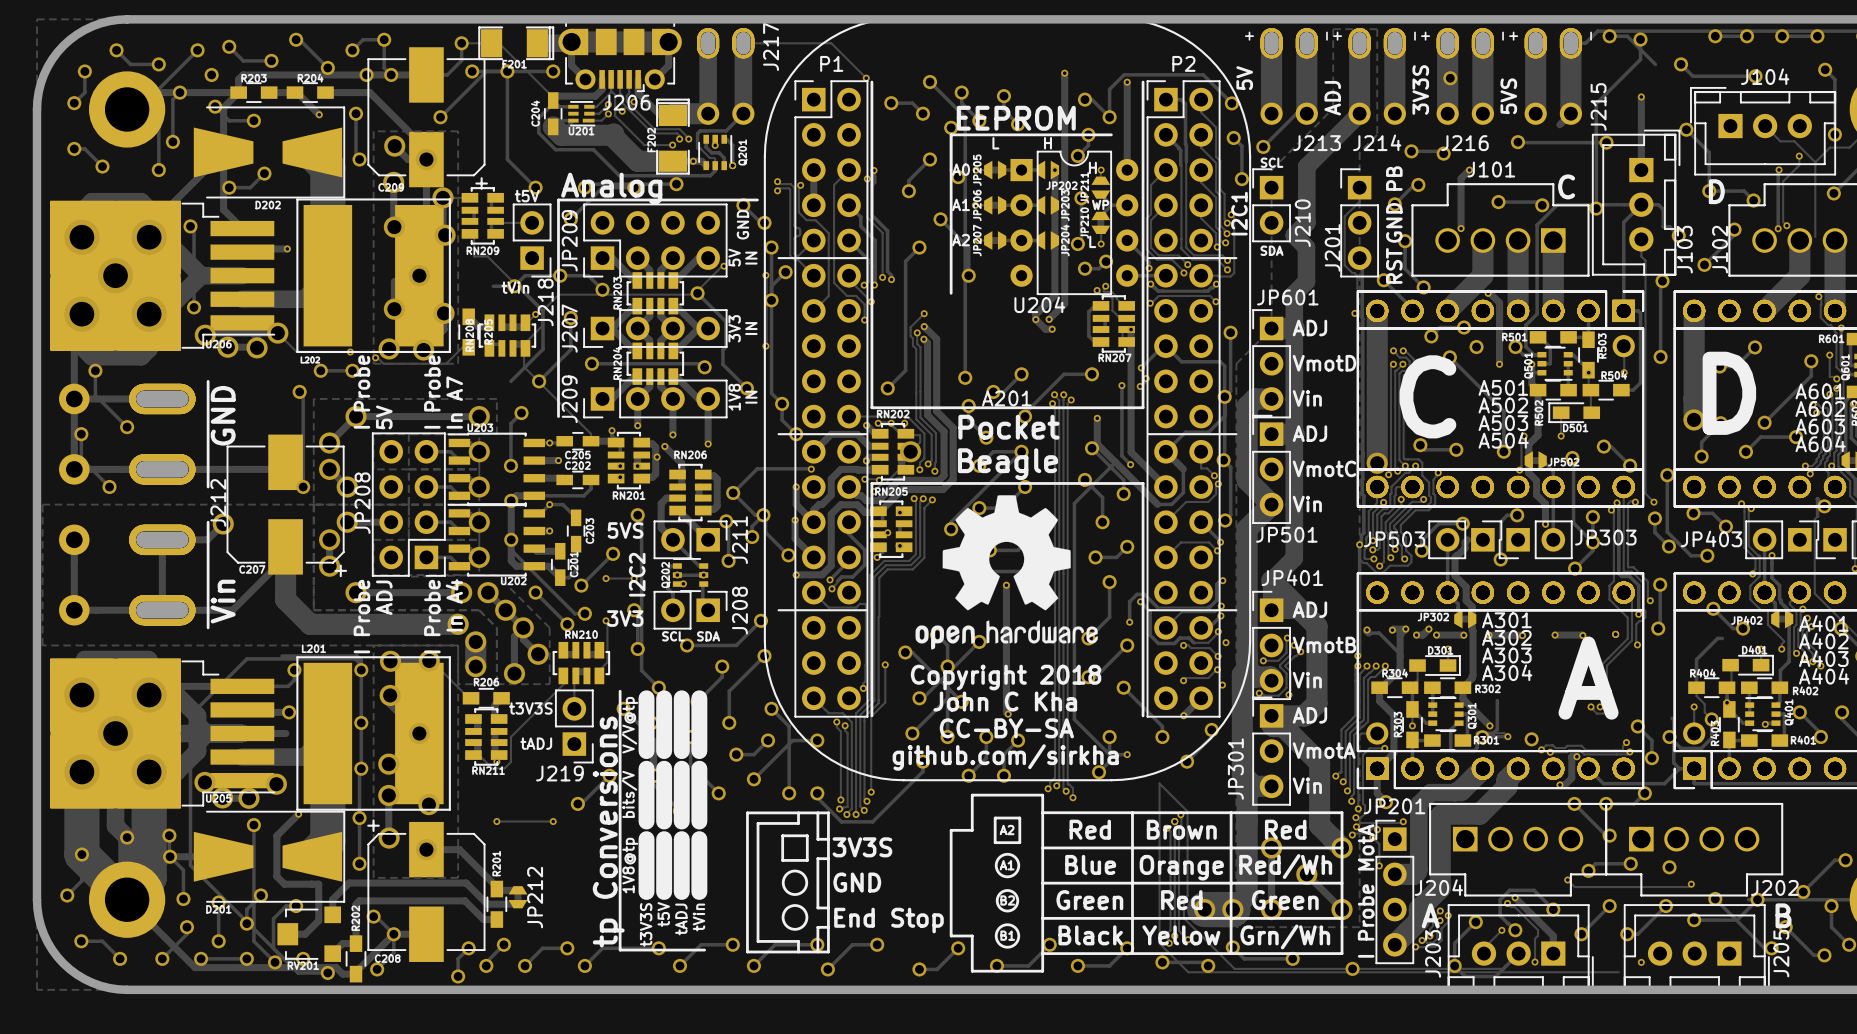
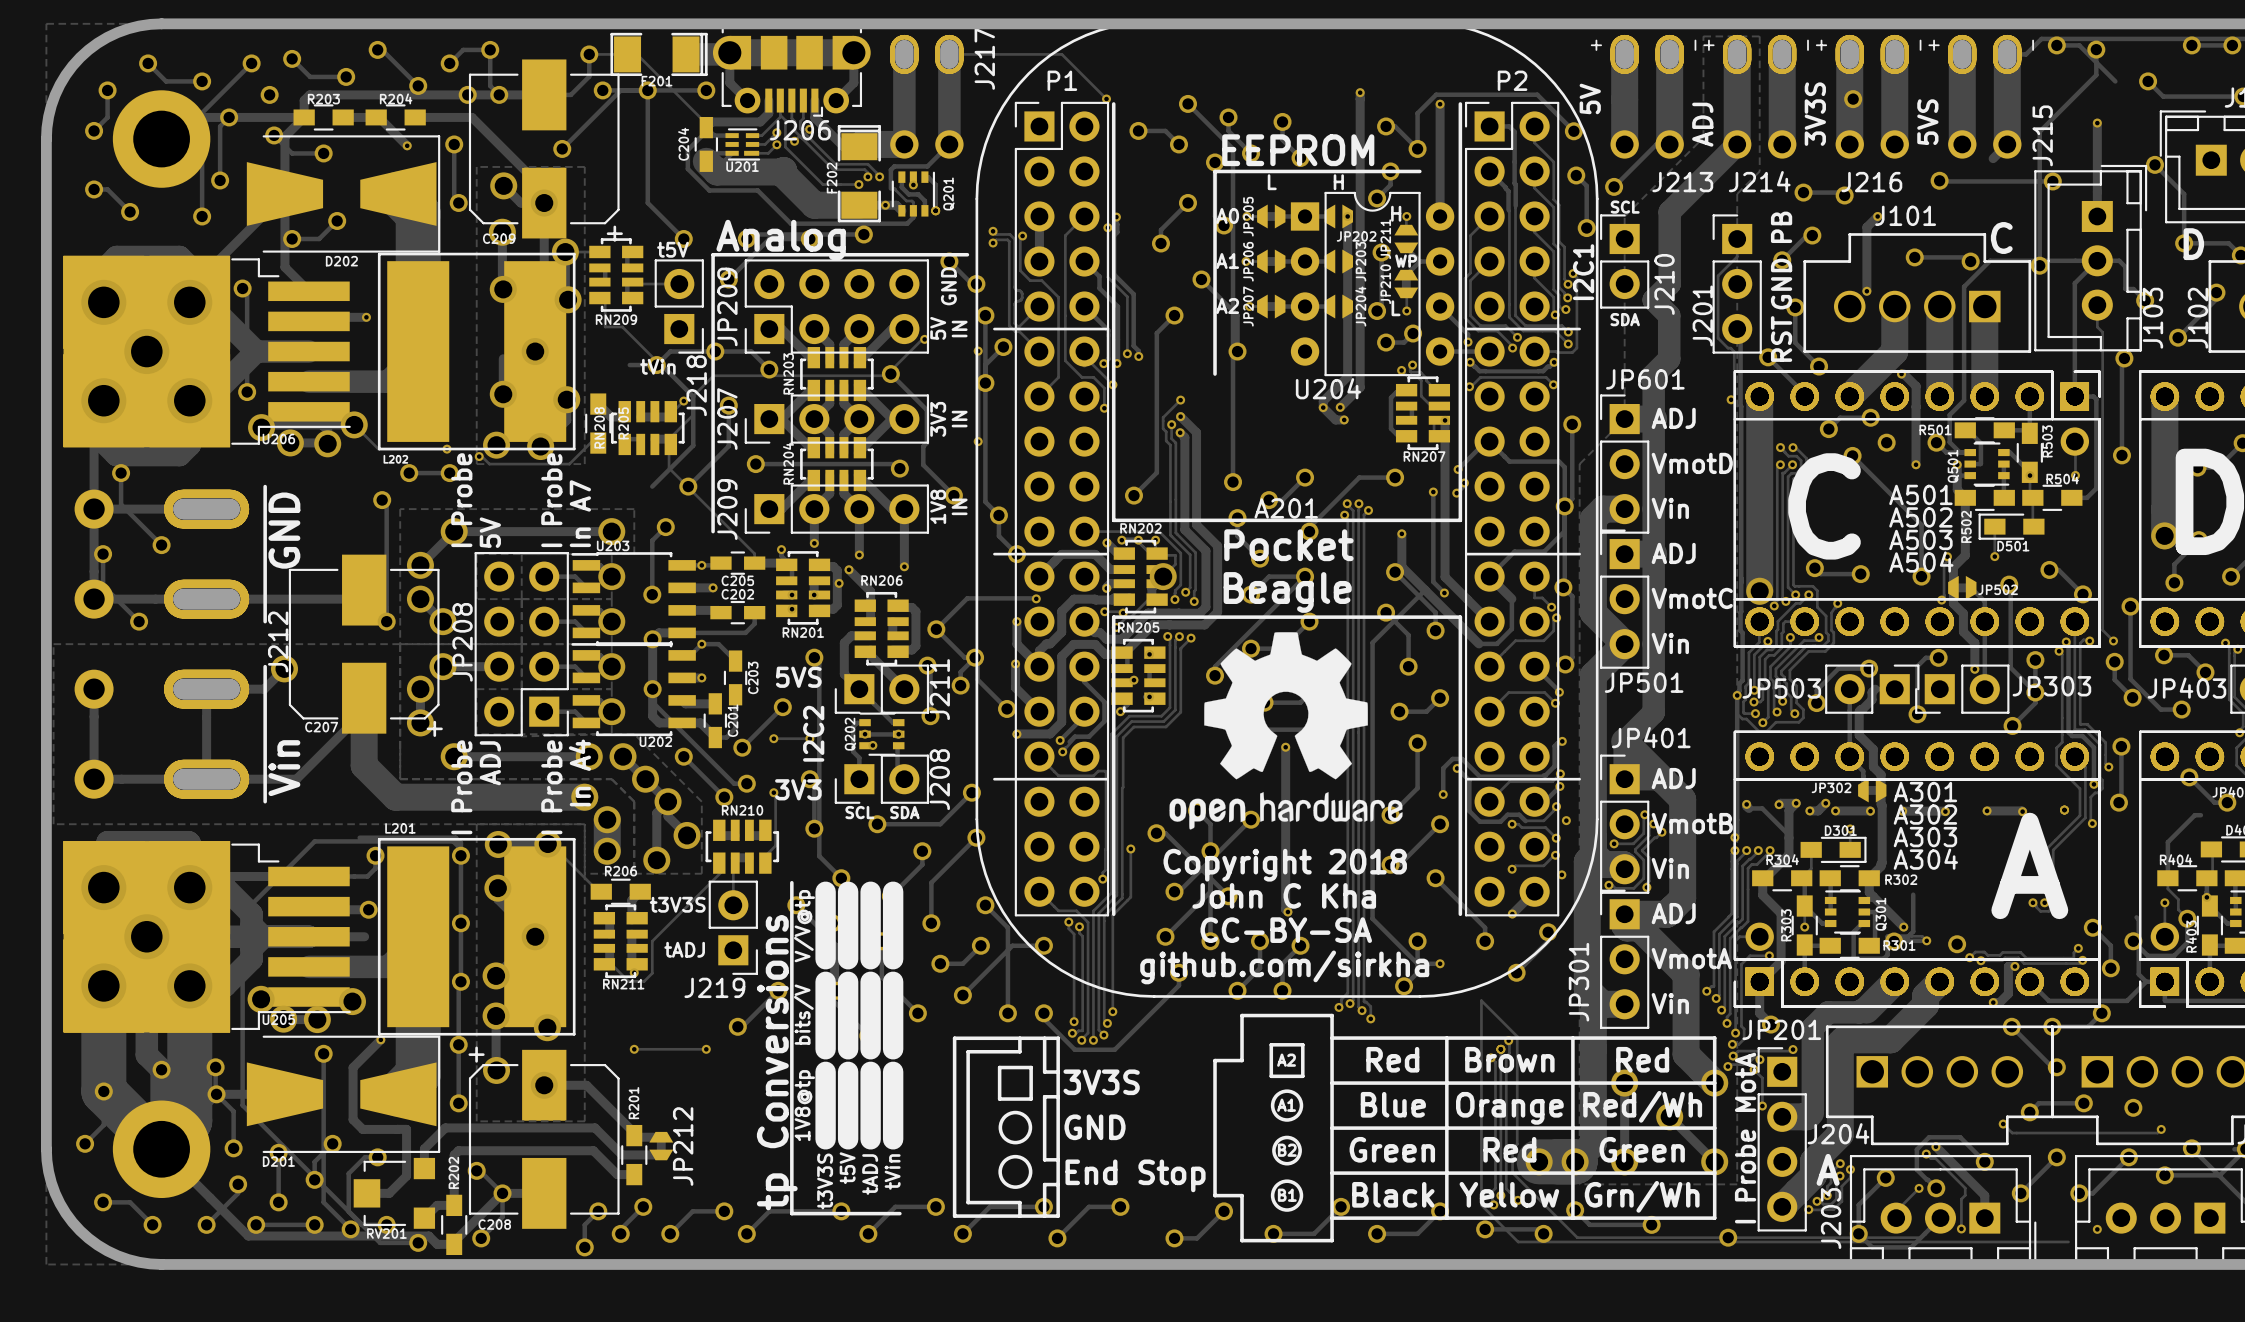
J211 rotation: 0° (690, 539) -> 180° (881, 689)
J208 rotation: 0° (690, 610) -> 180° (881, 779)

